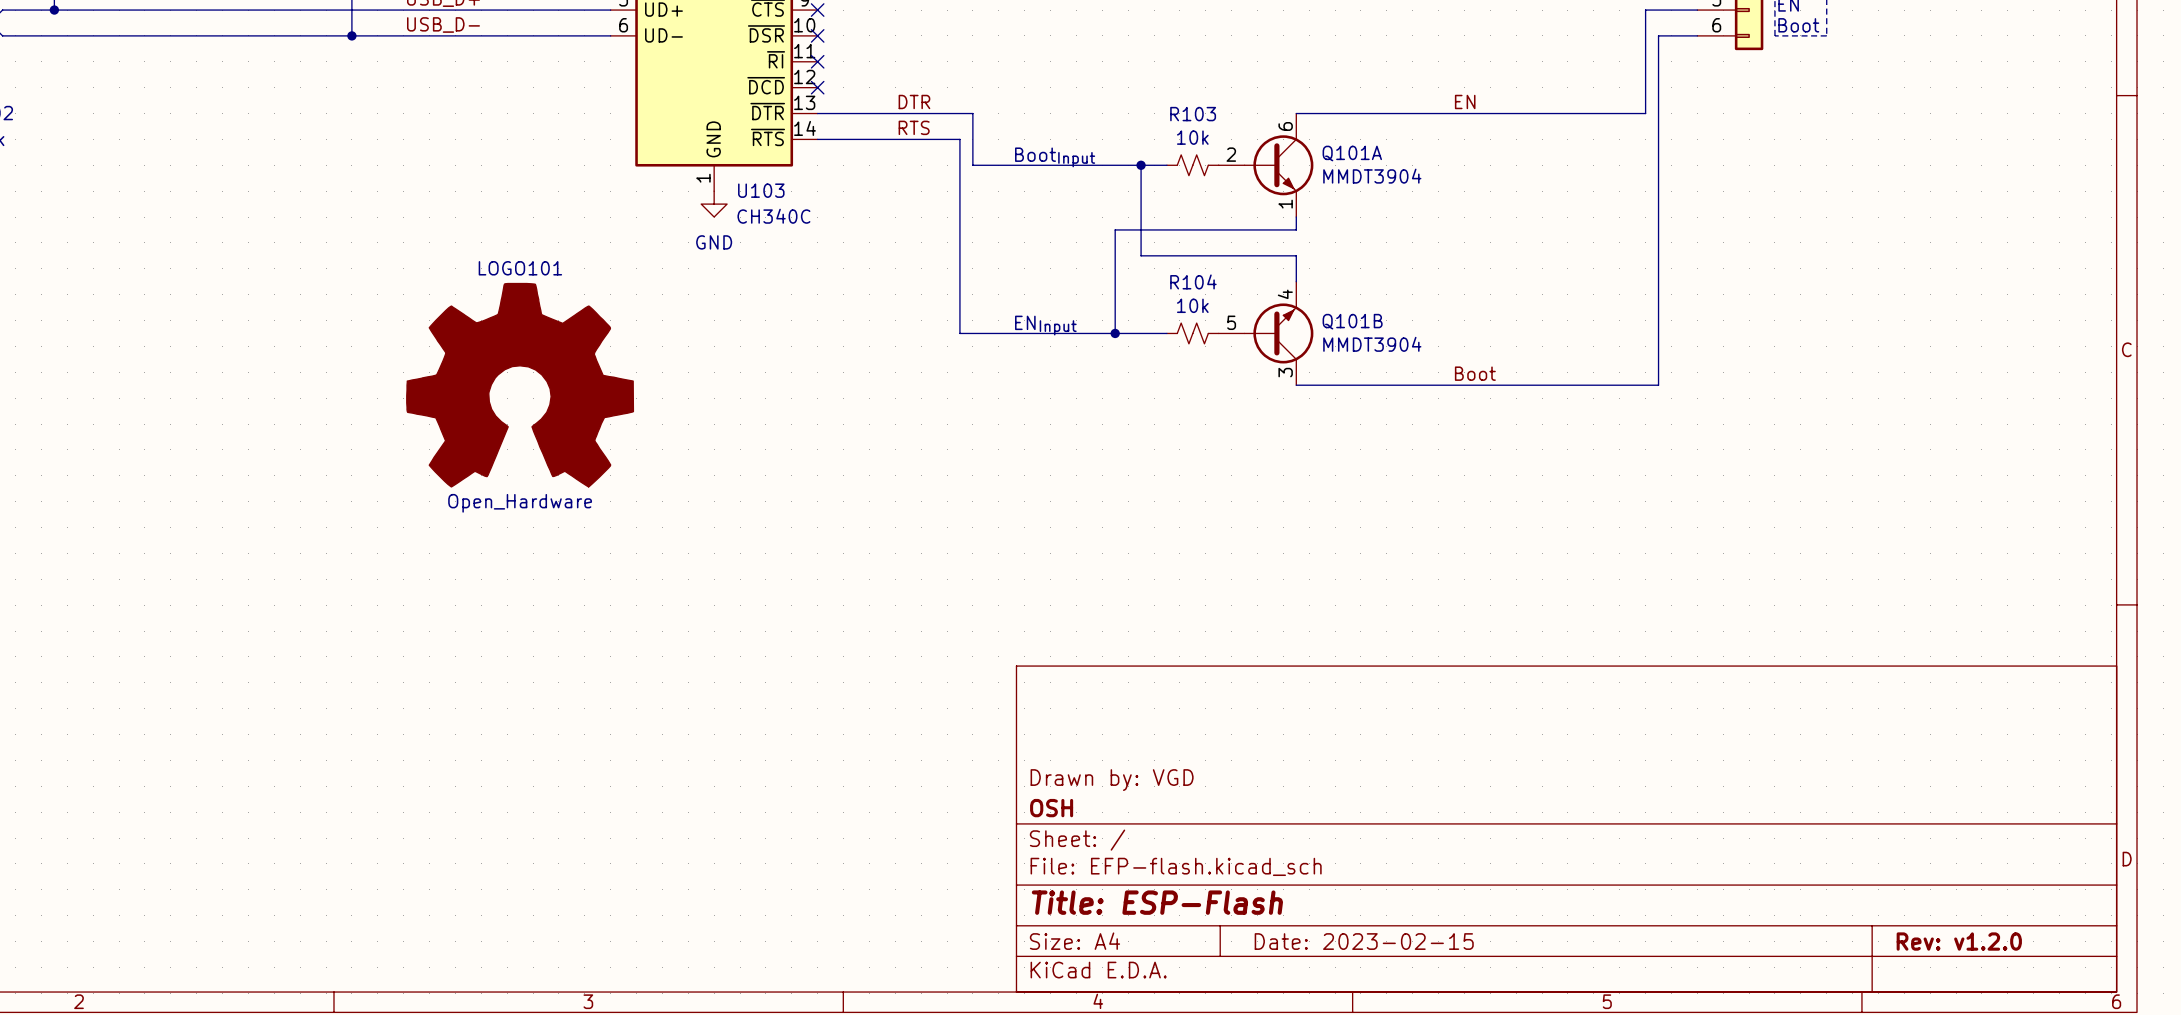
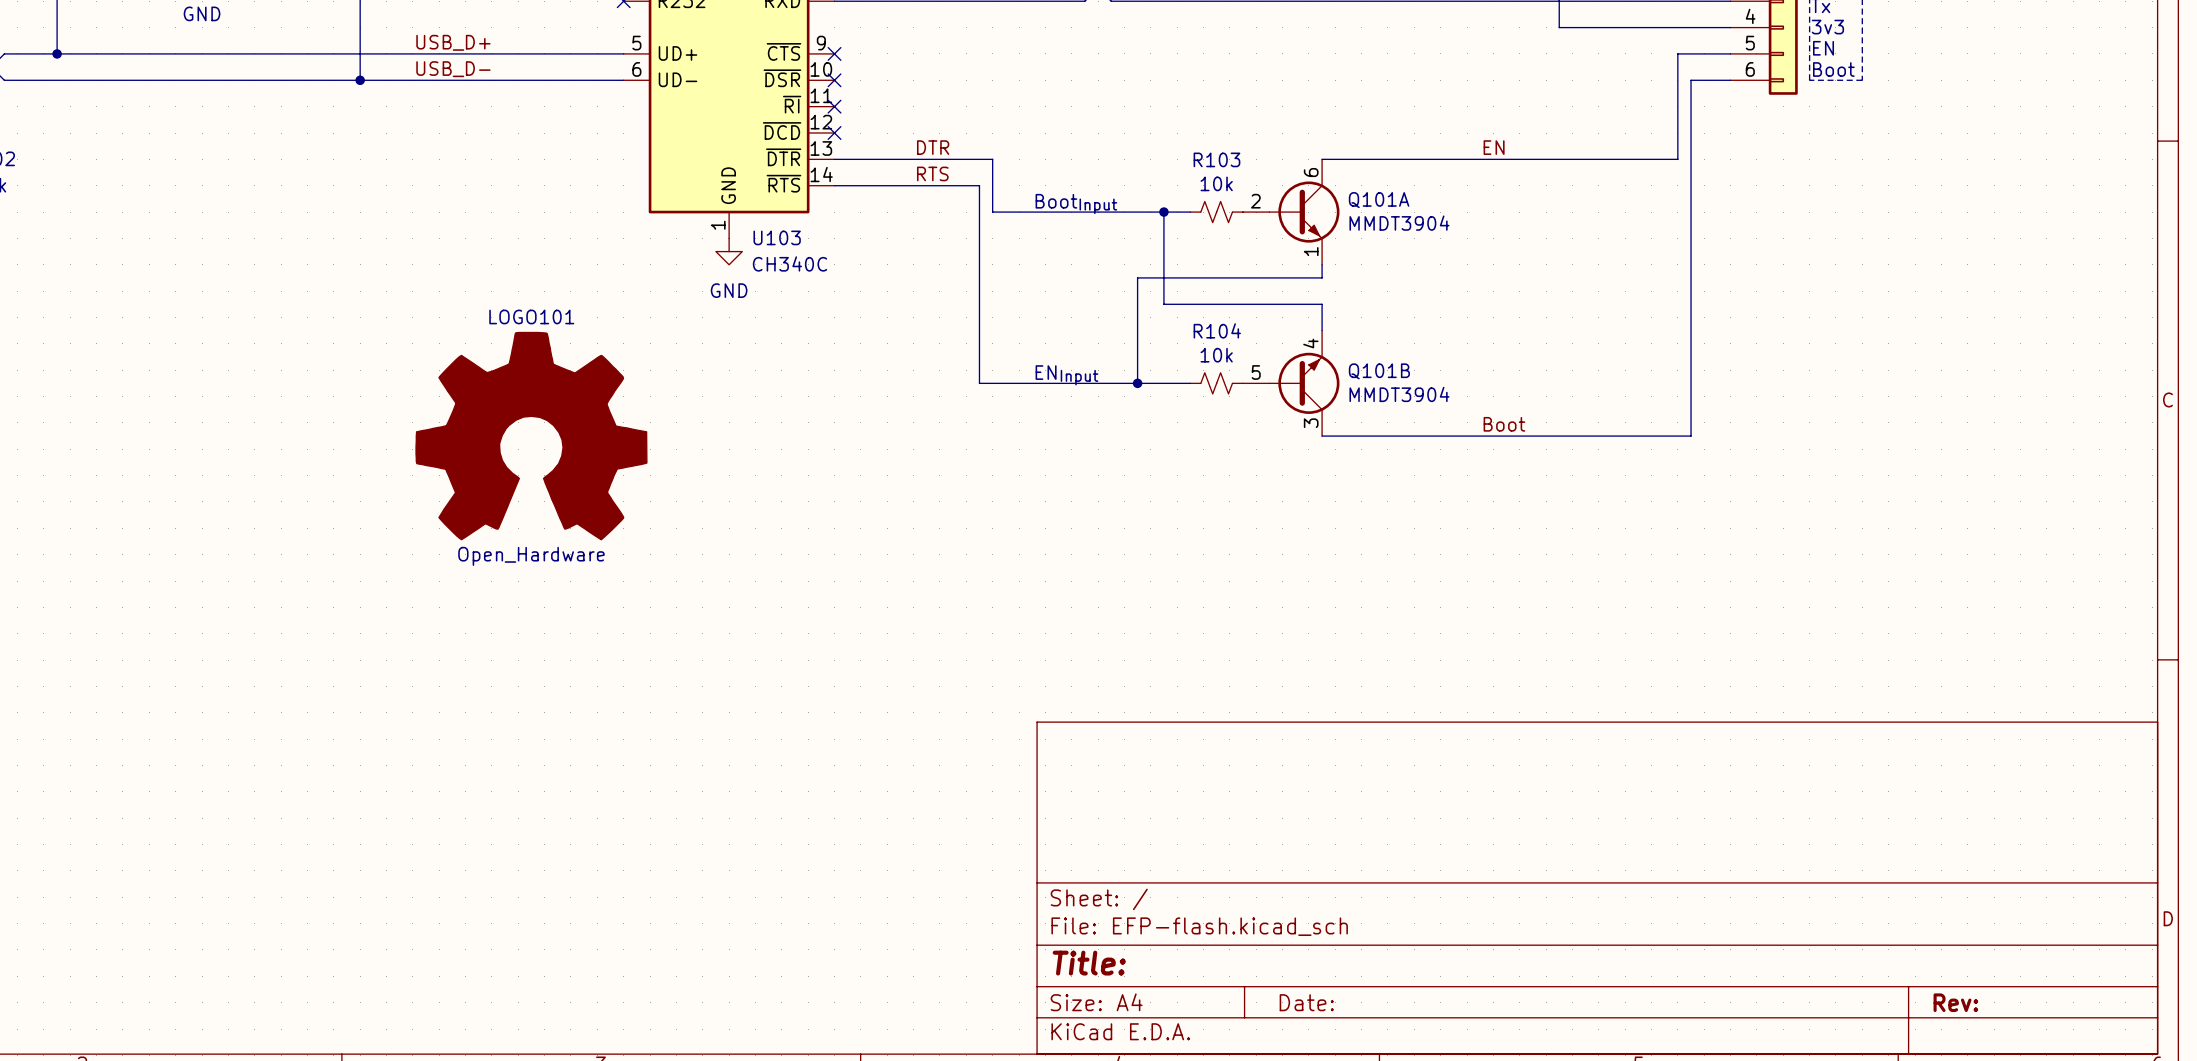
title block: Drawn by: VGD (1112, 780) -> none
title block: OSH (1051, 808) -> none
title block: Title: ESP-Flash (1157, 902) -> Title: (1089, 963)
title block: Date: 2023-02-15 (1364, 941) -> Date: (1306, 1002)
title block: Rev: v1.2.0 (1959, 941) -> Rev: (1955, 1002)

